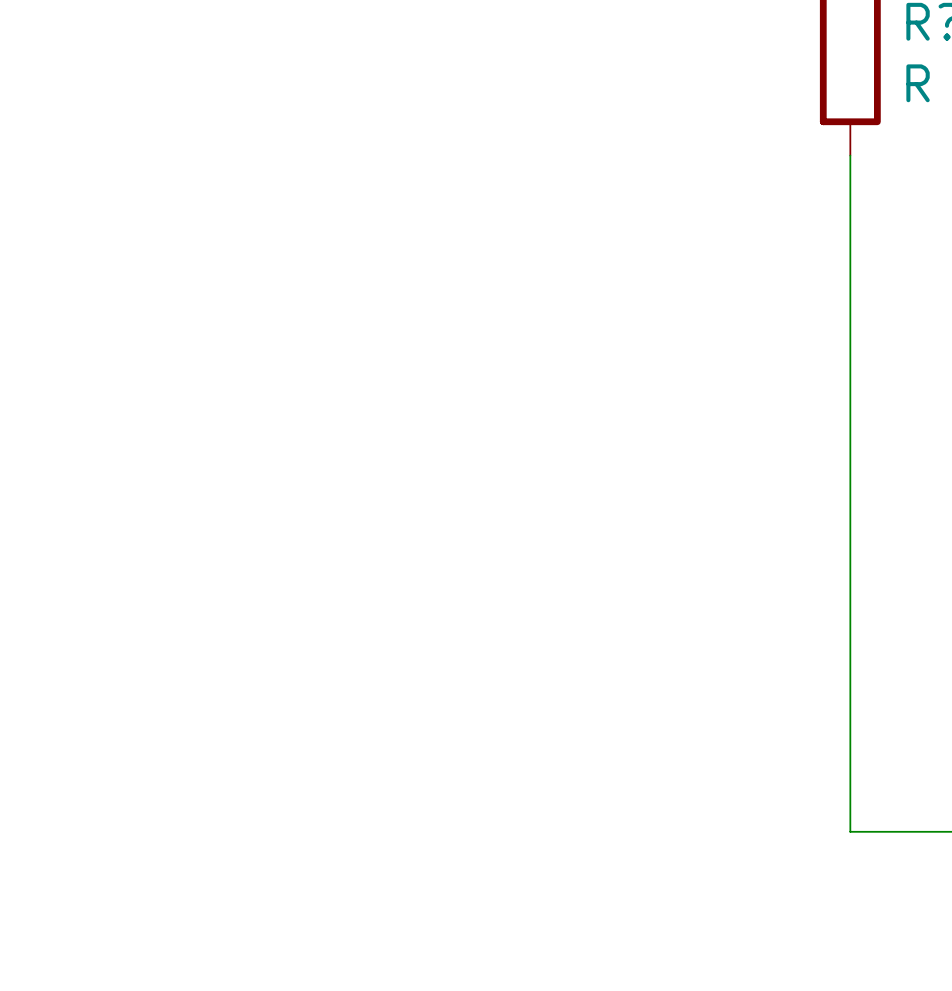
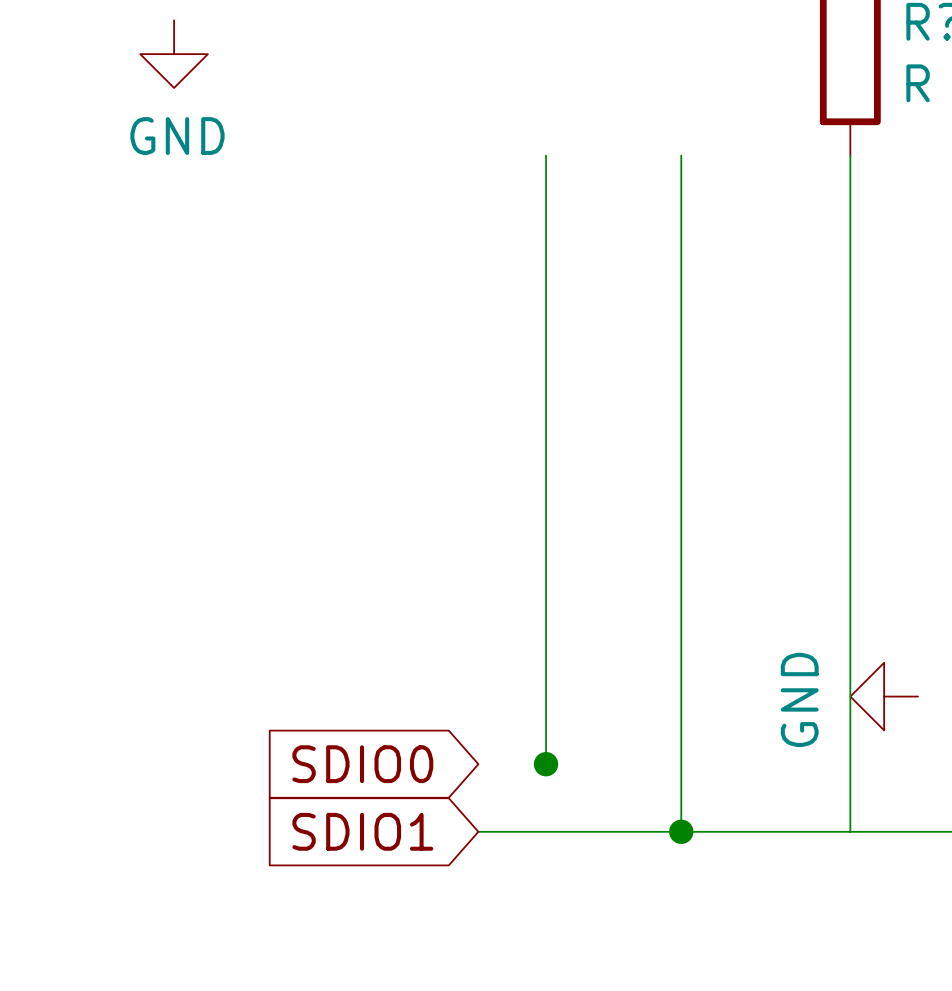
power symbol: none -> GND (174, 54)
wire: none -> (546, 155) (546, 764)
wire: none -> (681, 155) (681, 831)
power symbol: none -> GND (884, 696)
global label: none -> SDIO0 (362, 764)
junction: none -> (546, 764)
global label: none -> SDIO1 (362, 831)
wire: none -> (478, 831) (850, 831)
junction: none -> (681, 831)

